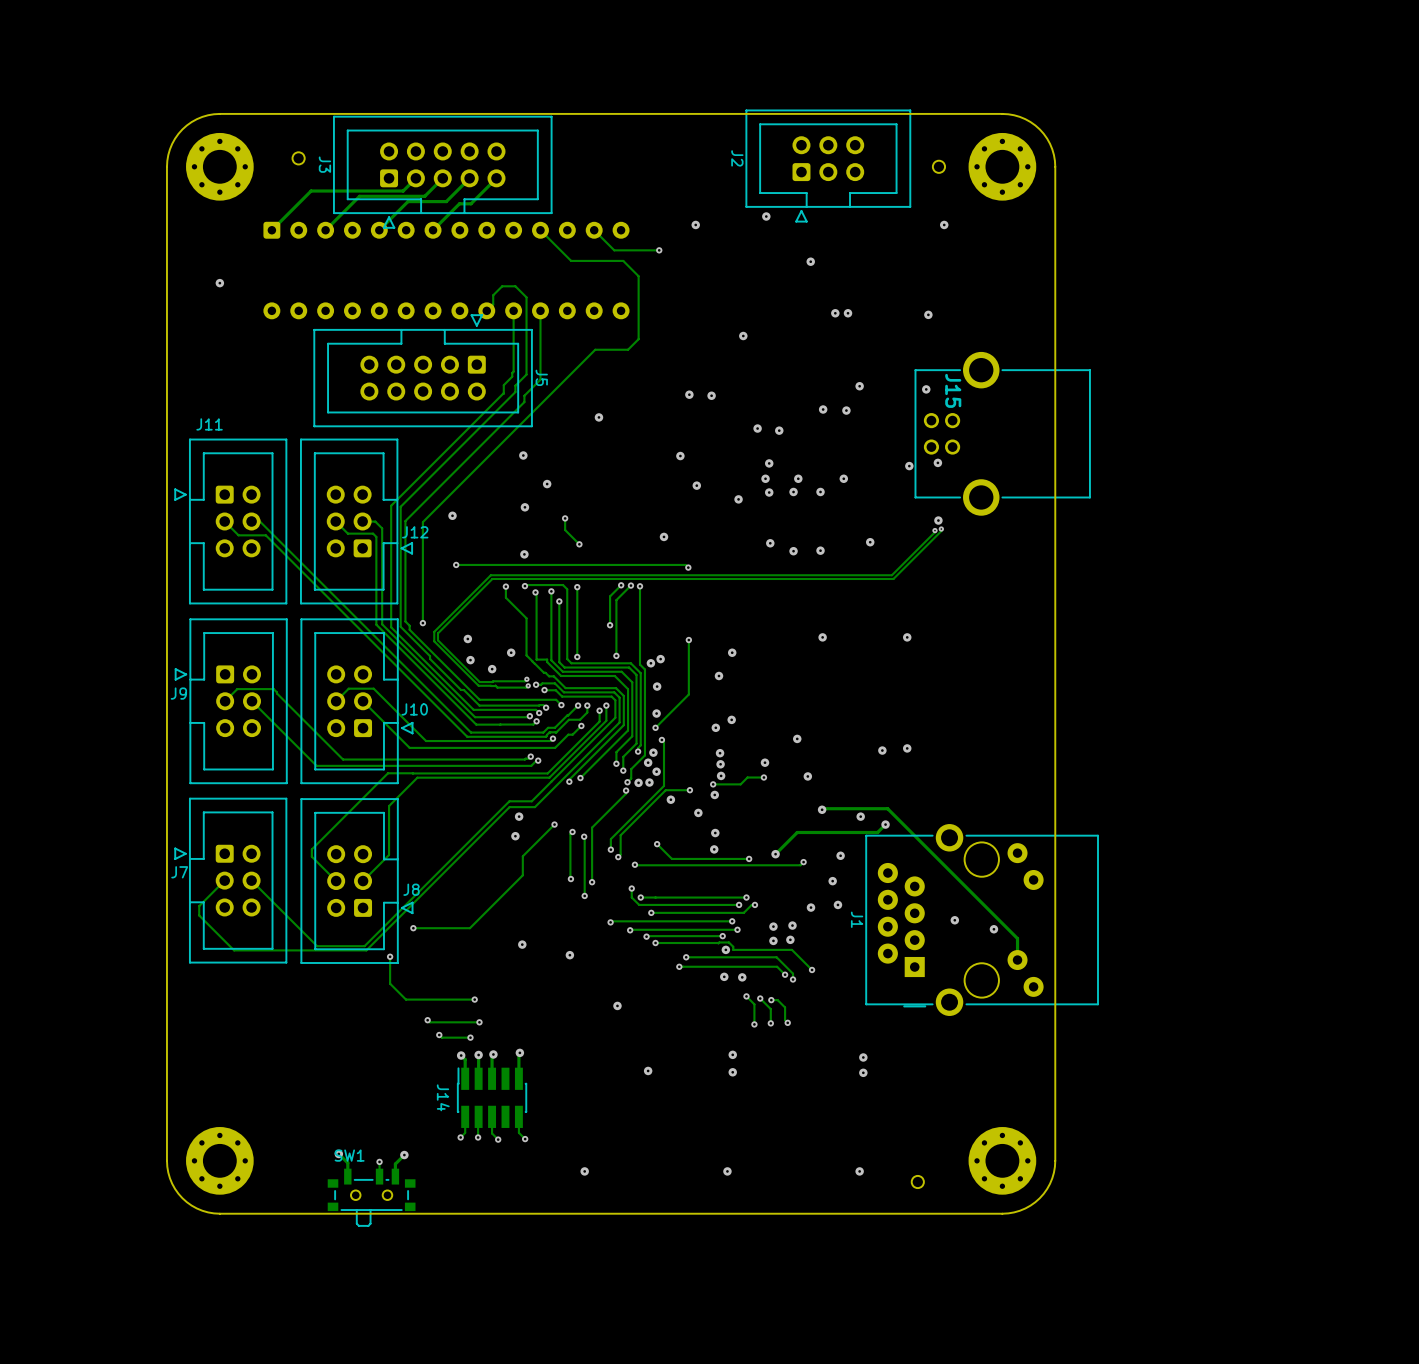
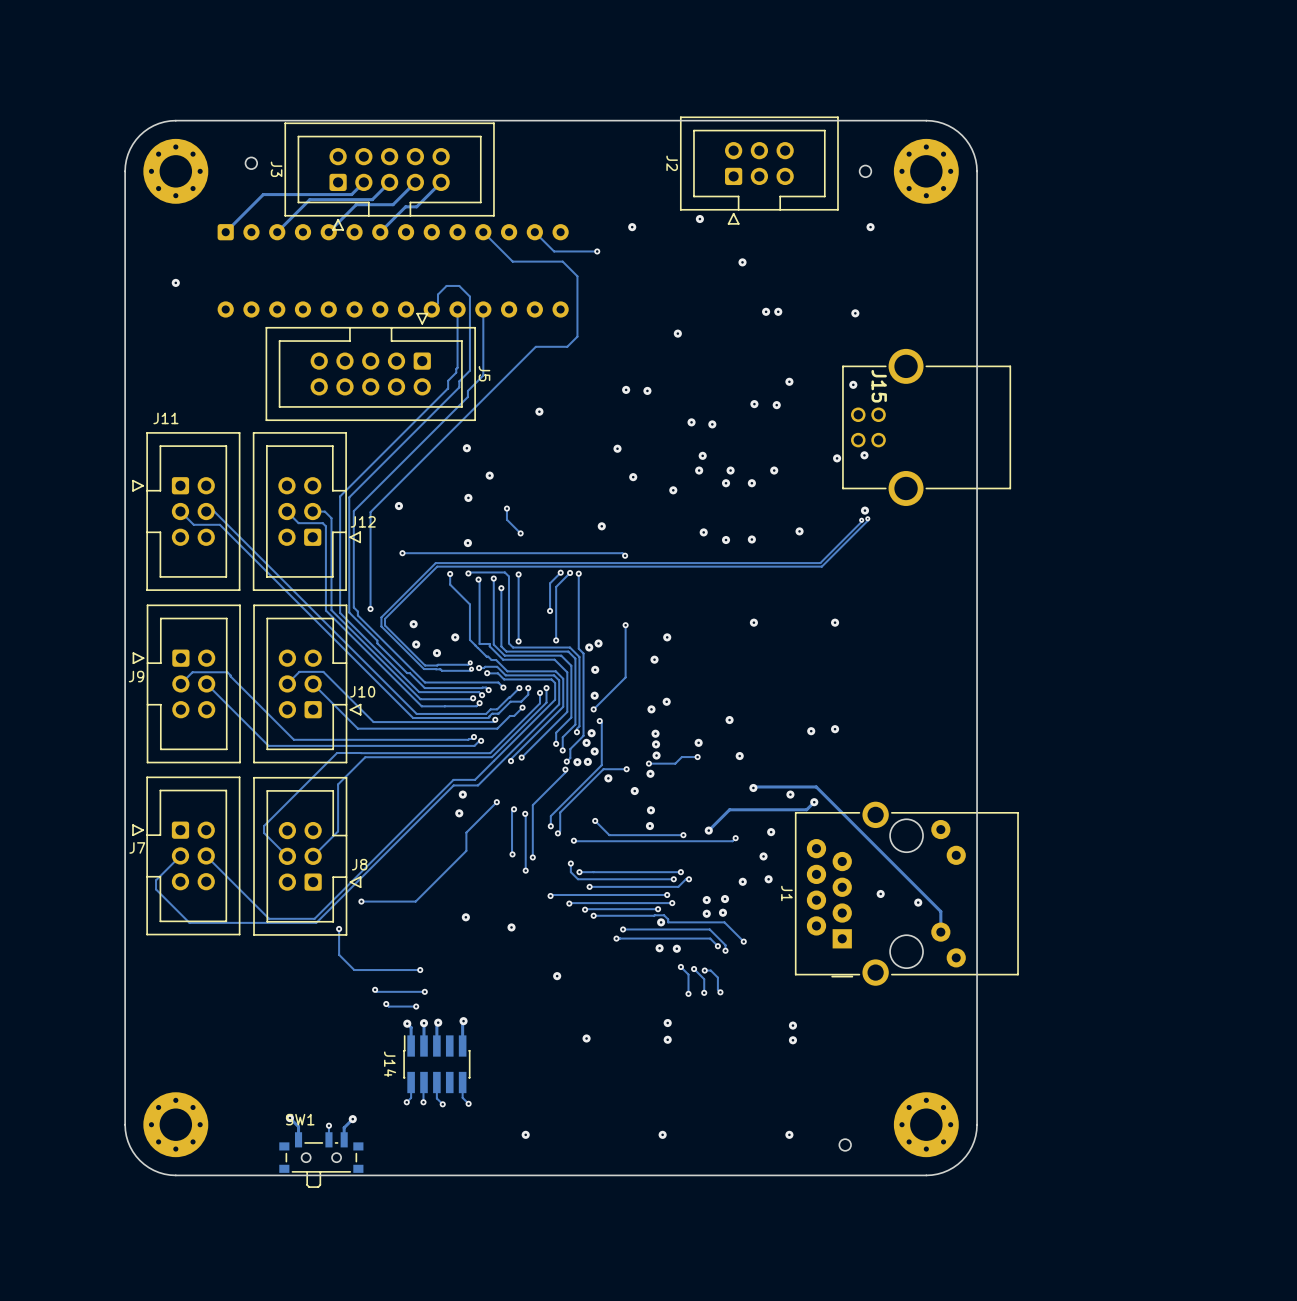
via: (769, 492) -> none

